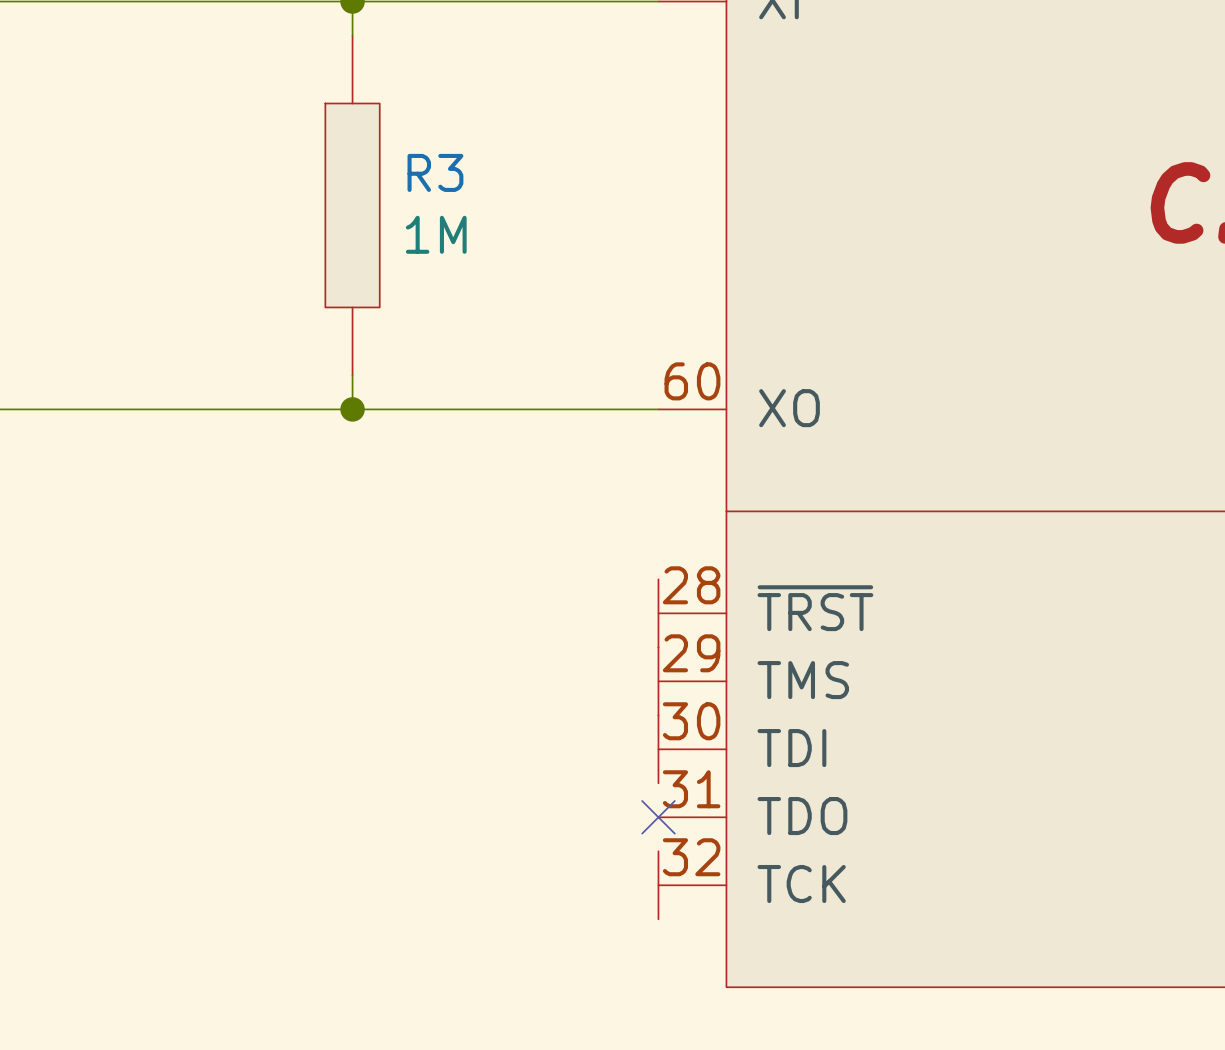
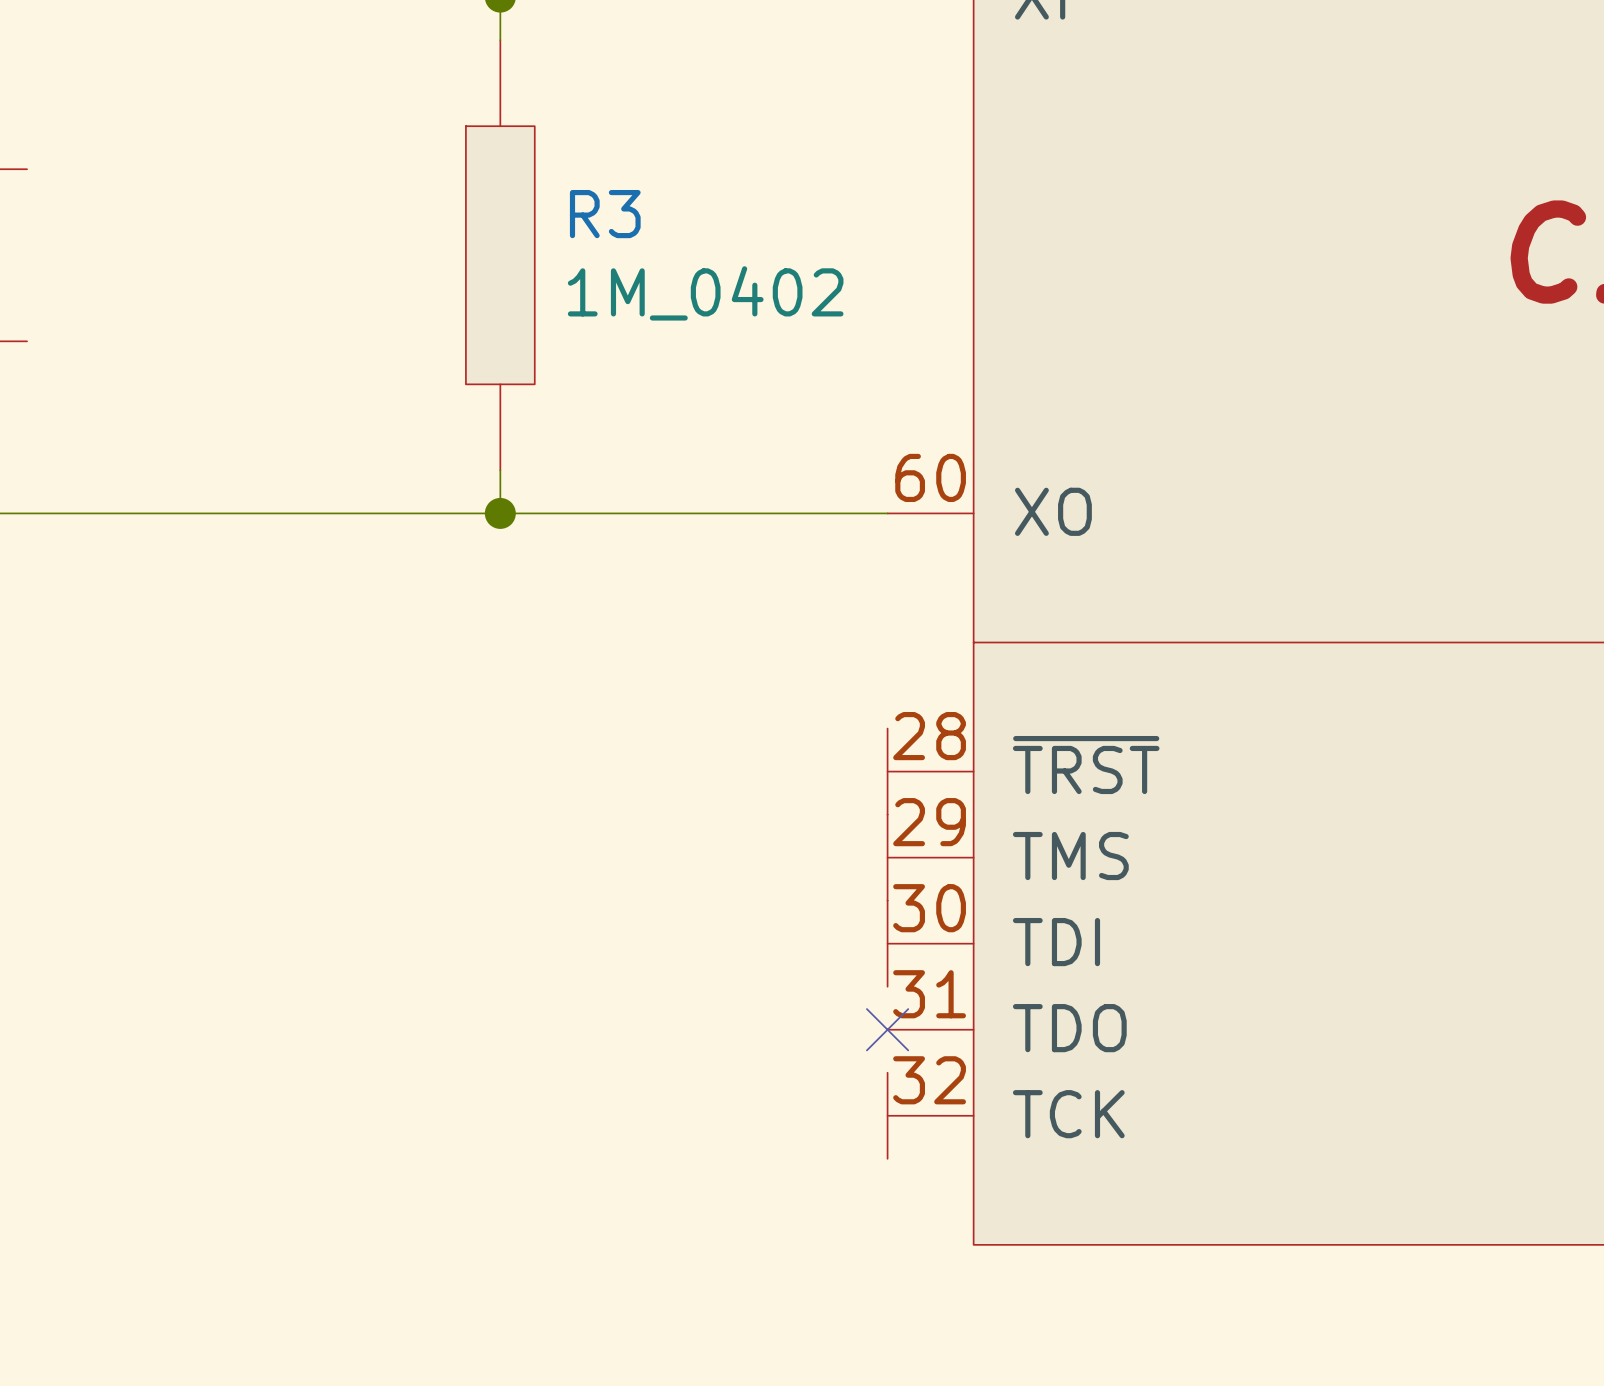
R3 value: 1M (436, 234) -> 1M_0402 (705, 293)

